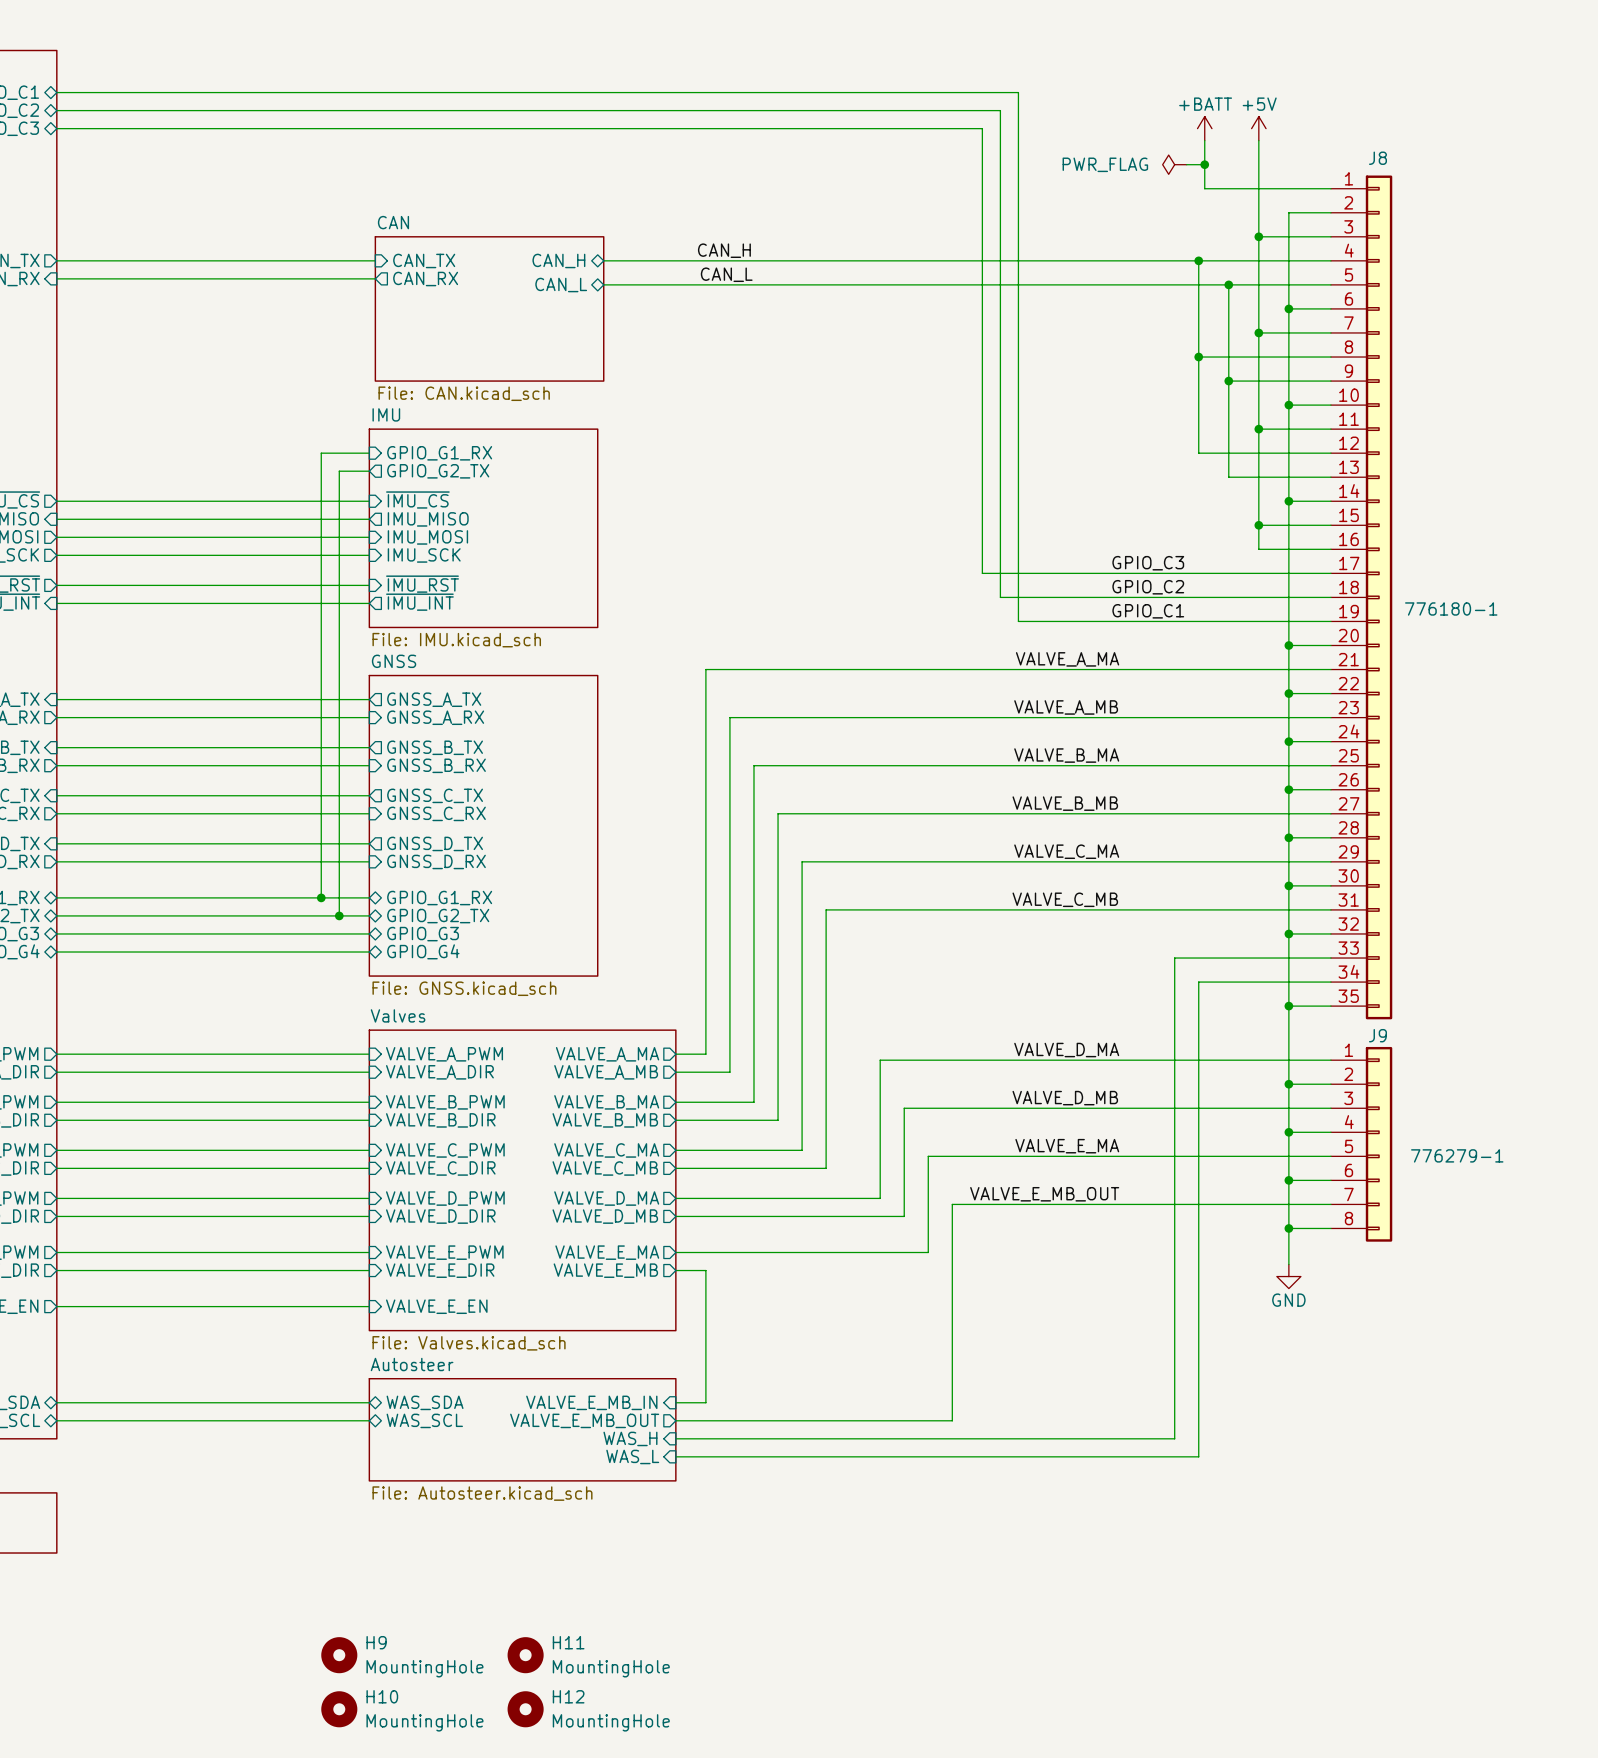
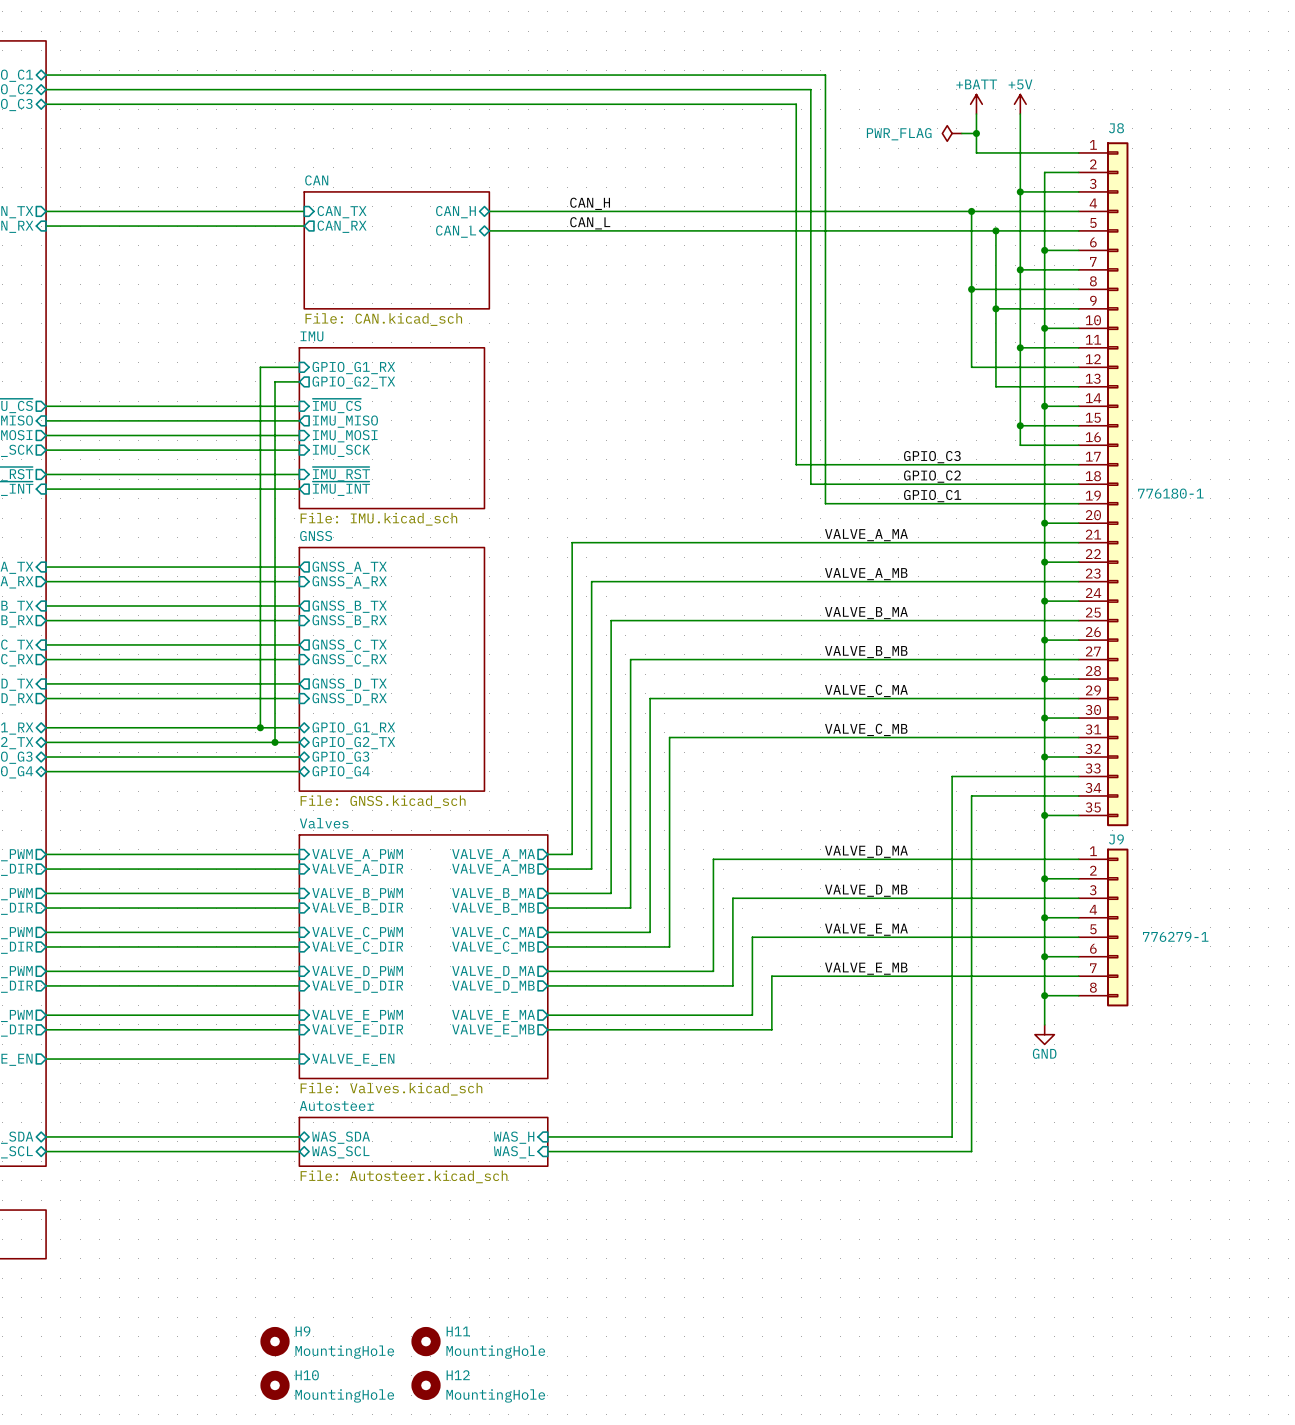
label: VALVE_E_MB_OUT (1044, 1194) -> VALVE_E_MB (866, 968)
wire: (705, 1270) (705, 1402) -> (572, 1029) (771, 1029)
wire: (952, 1270) (952, 1420) -> none
sheet pin: VALVE_E_MB_IN (591, 1402) -> WAS_H (514, 1137)
wire: (1174, 1402) (1174, 1438) (675, 1438) -> (952, 1136) (572, 1136)
sheet Autosteer: none -> File: Autosteer.kicad_sch (423, 1141)
sheet pin shape: output (584, 1420) -> input (514, 1152)
sheet pin: VALVE_E_MB_OUT (584, 1420) -> WAS_L (514, 1152)
wire: (1198, 1420) (1198, 1456) (675, 1456) -> (971, 1151) (771, 1151)
sheet Autosteer: File: Autosteer.kicad_sch (522, 1429) -> none
sheet pin: WAS_H (630, 1438) -> none
sheet pin: WAS_L (632, 1456) -> none

